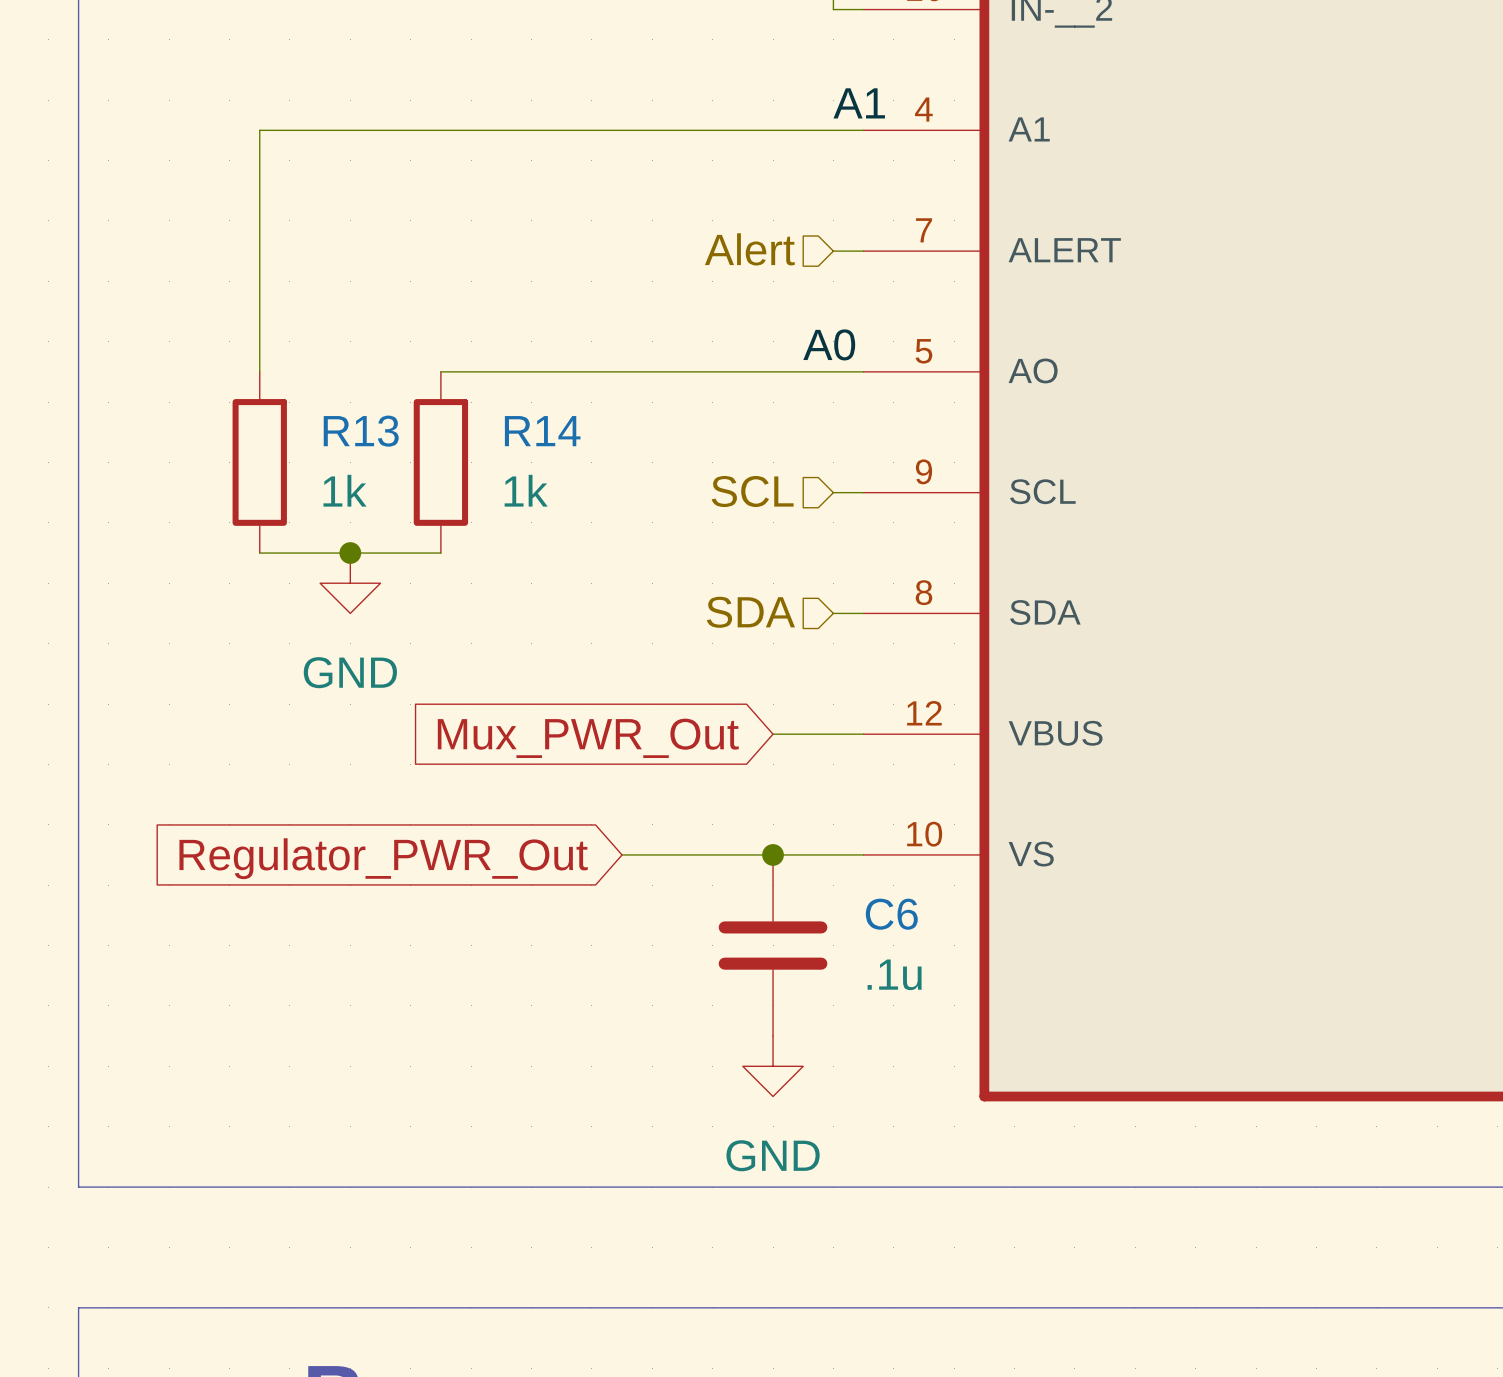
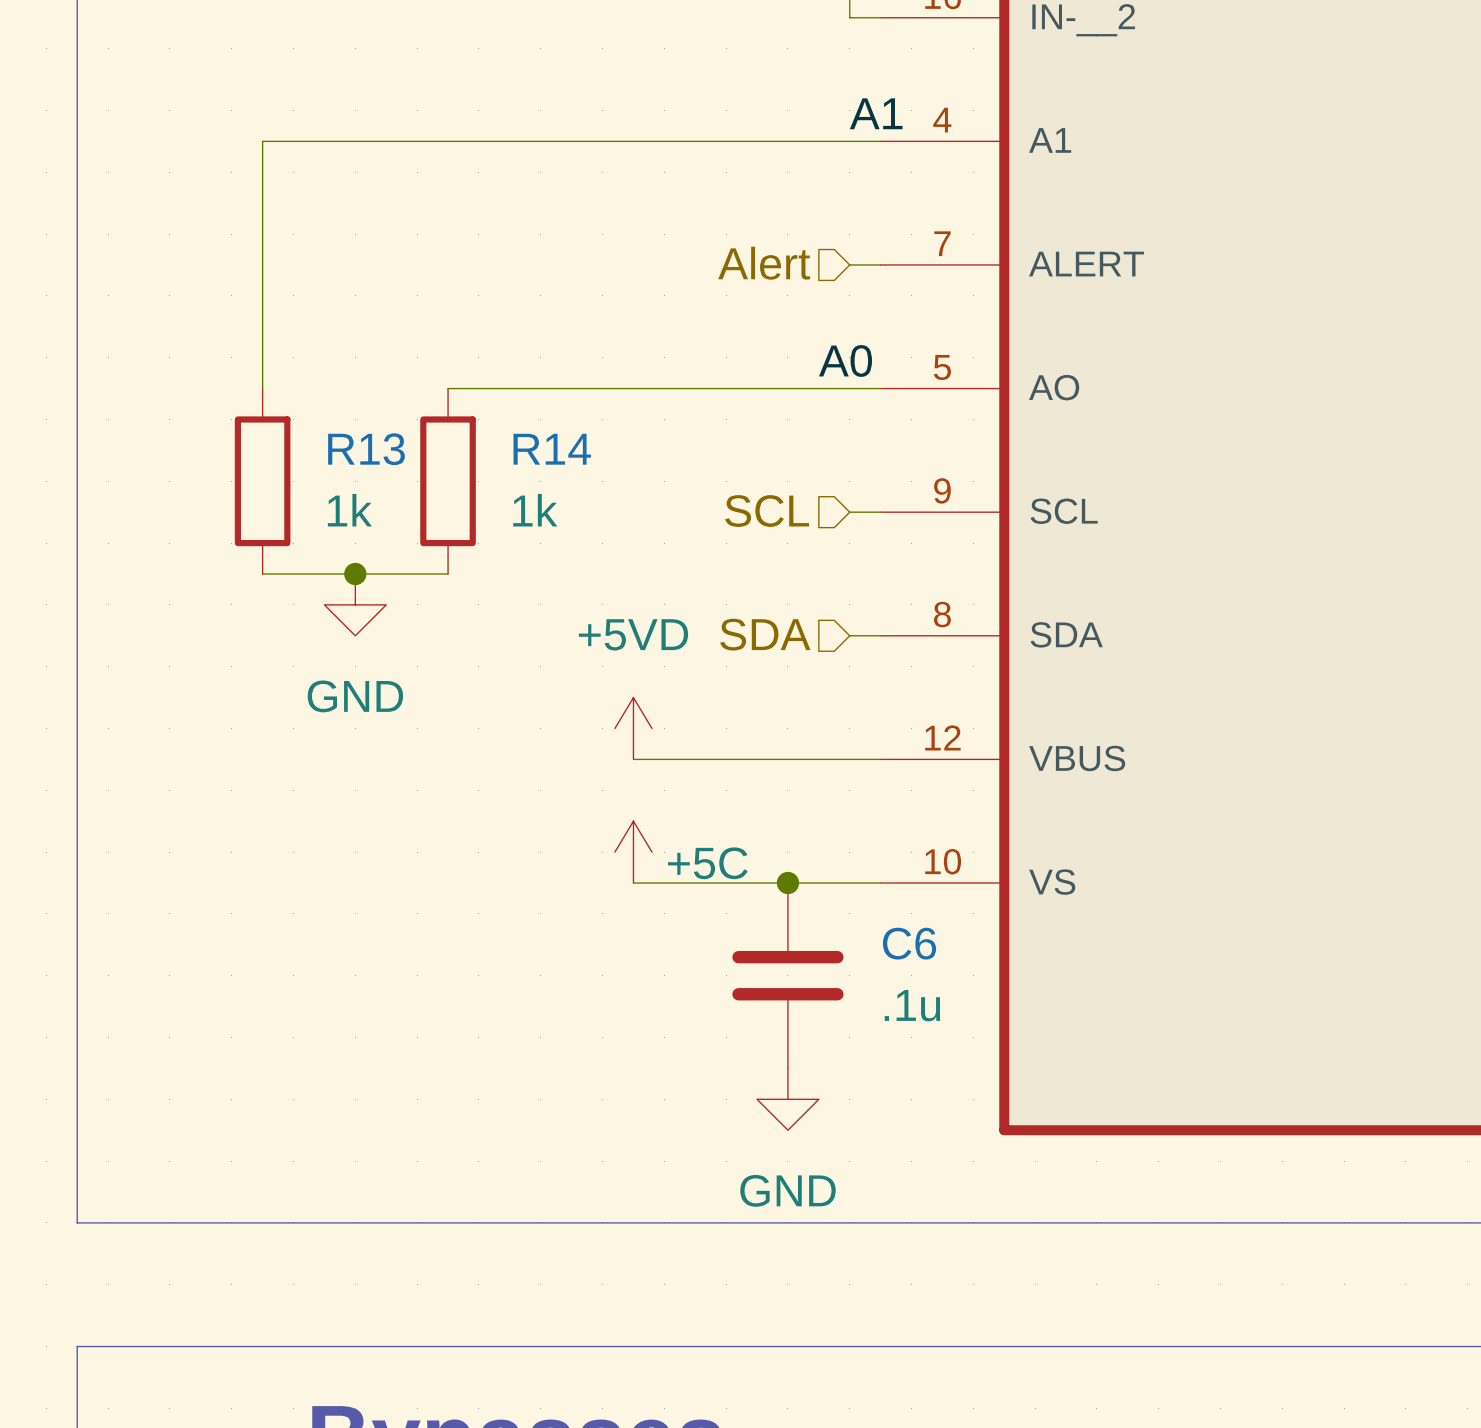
power symbol: none -> +5VD (633, 728)
wire: none -> (633, 759) (787, 759)
global label: Mux_PWR_Out (588, 738) -> none
power symbol: none -> +5C (633, 852)
global label: Regulator_PWR_Out (383, 858) -> none

